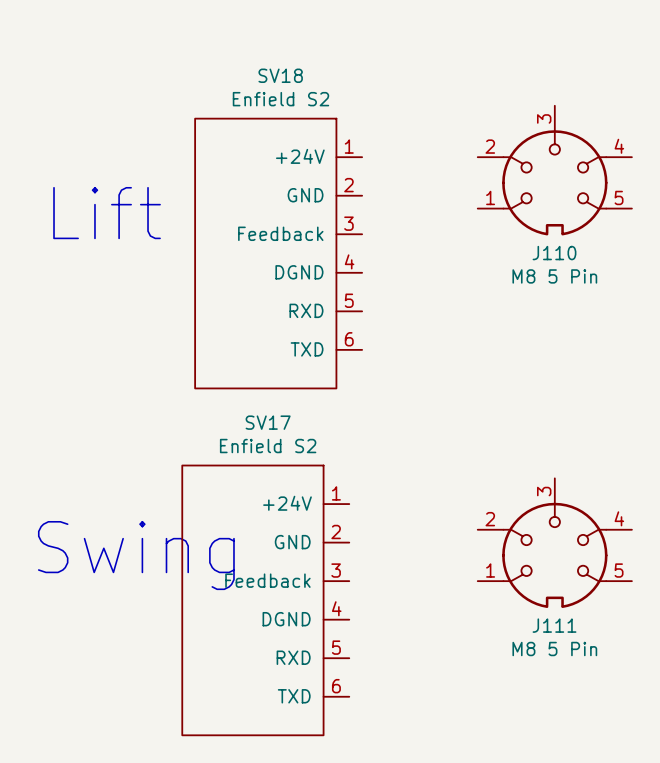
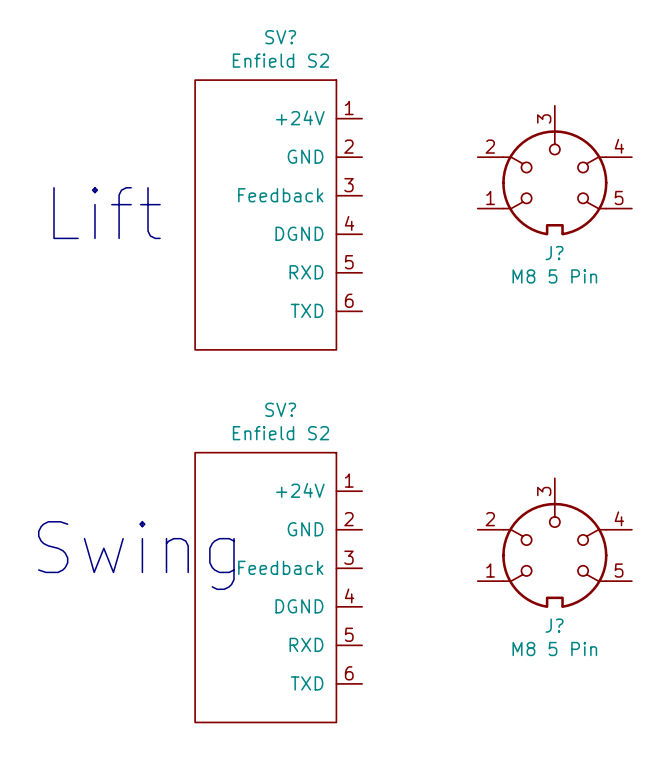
SV?: none -> Enfield S2 (278, 215)
SV18: Enfield S2 (278, 253) -> none
J110 name: J110 (554, 253) -> J? (554, 253)
SV?: none -> Enfield S2 (278, 587)
SV17: Enfield S2 (265, 600) -> none
J111 name: J111 (554, 625) -> J? (554, 625)

